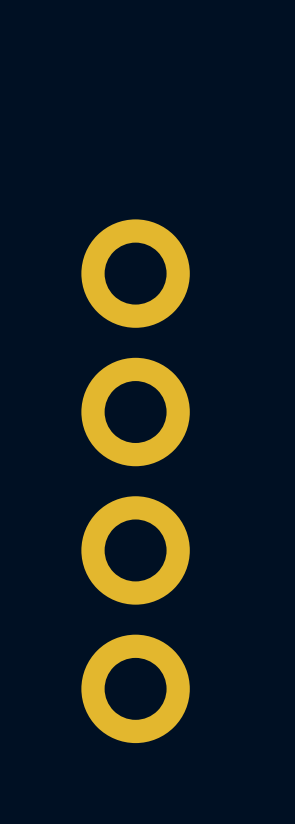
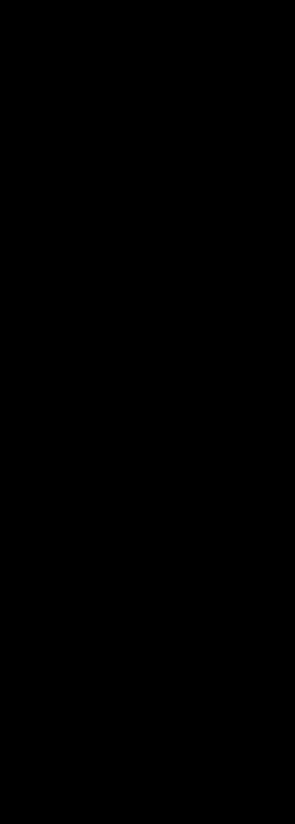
part: (135, 273) -> none
part: (135, 412) -> none
part: (135, 550) -> none
part: (135, 688) -> none

